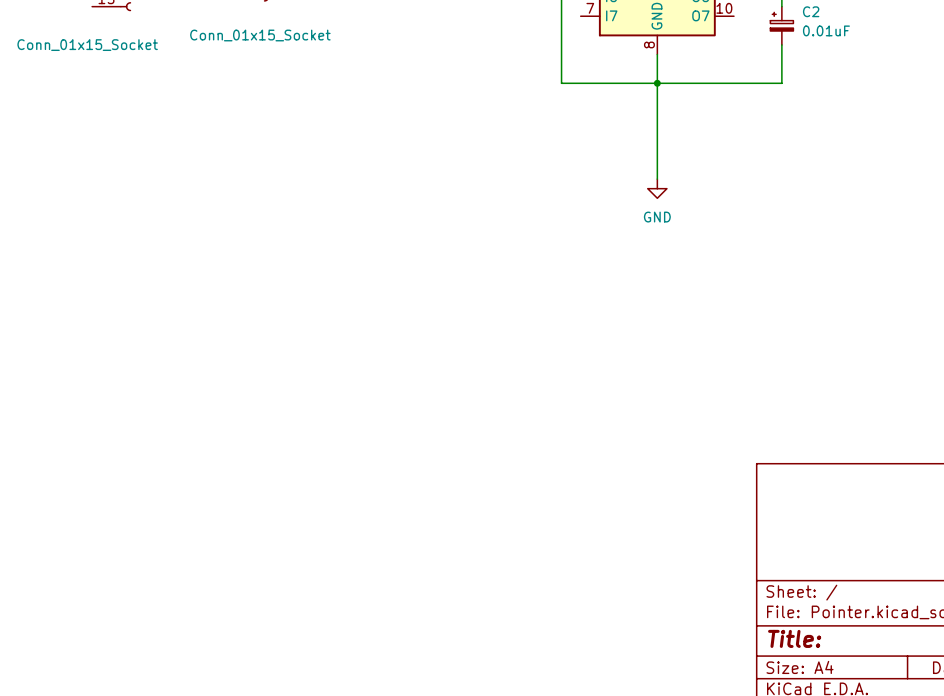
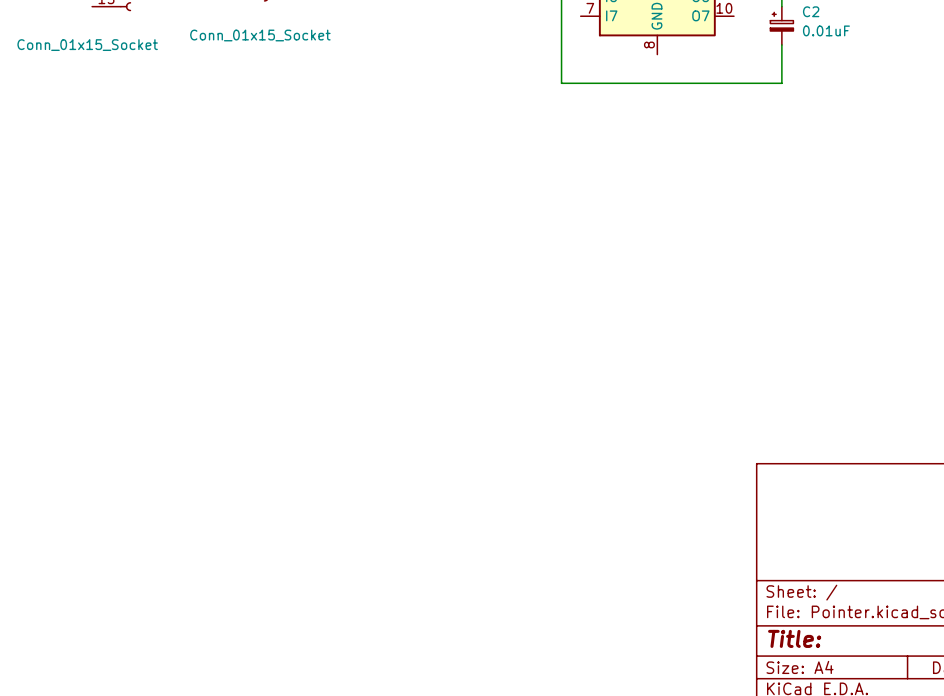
wire: (657, 54) (657, 179) -> none
junction: (657, 83) -> none
power symbol: GND (657, 188) -> none

